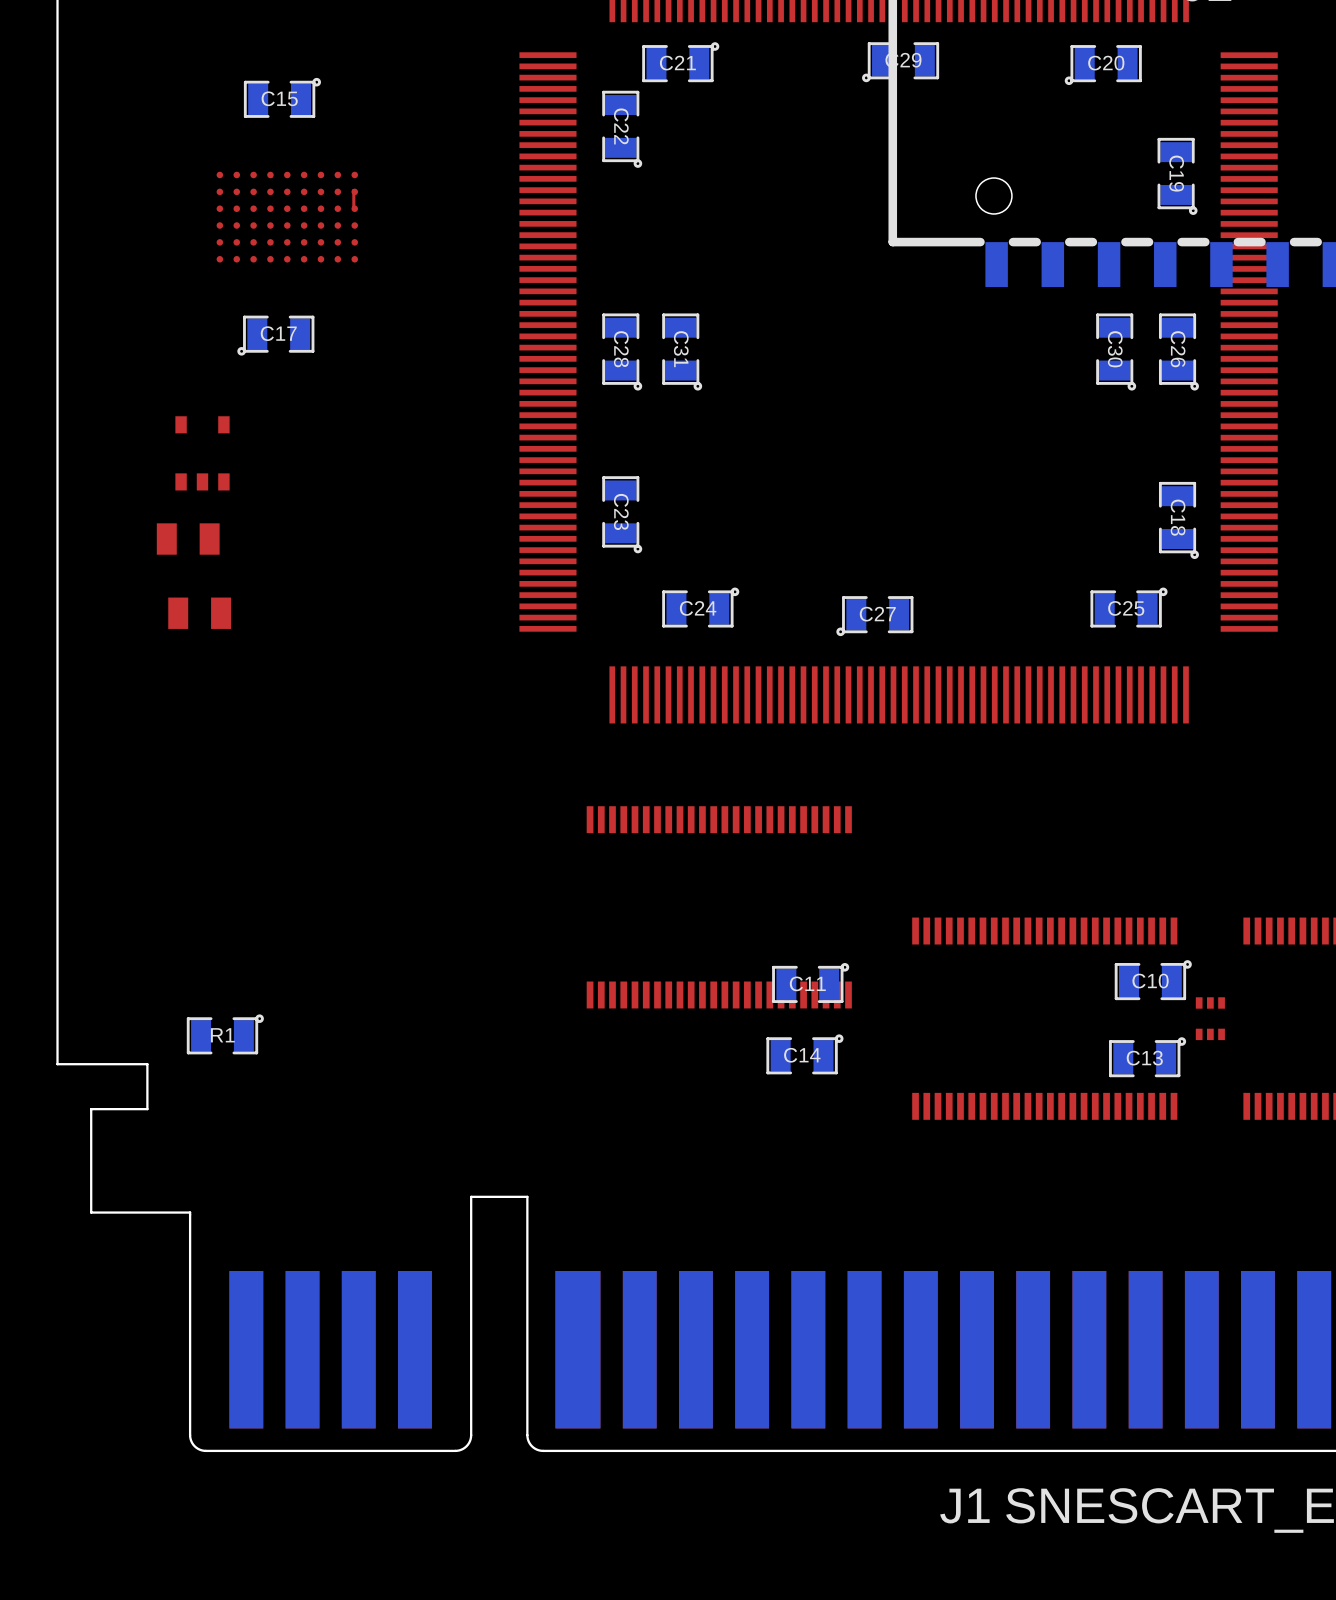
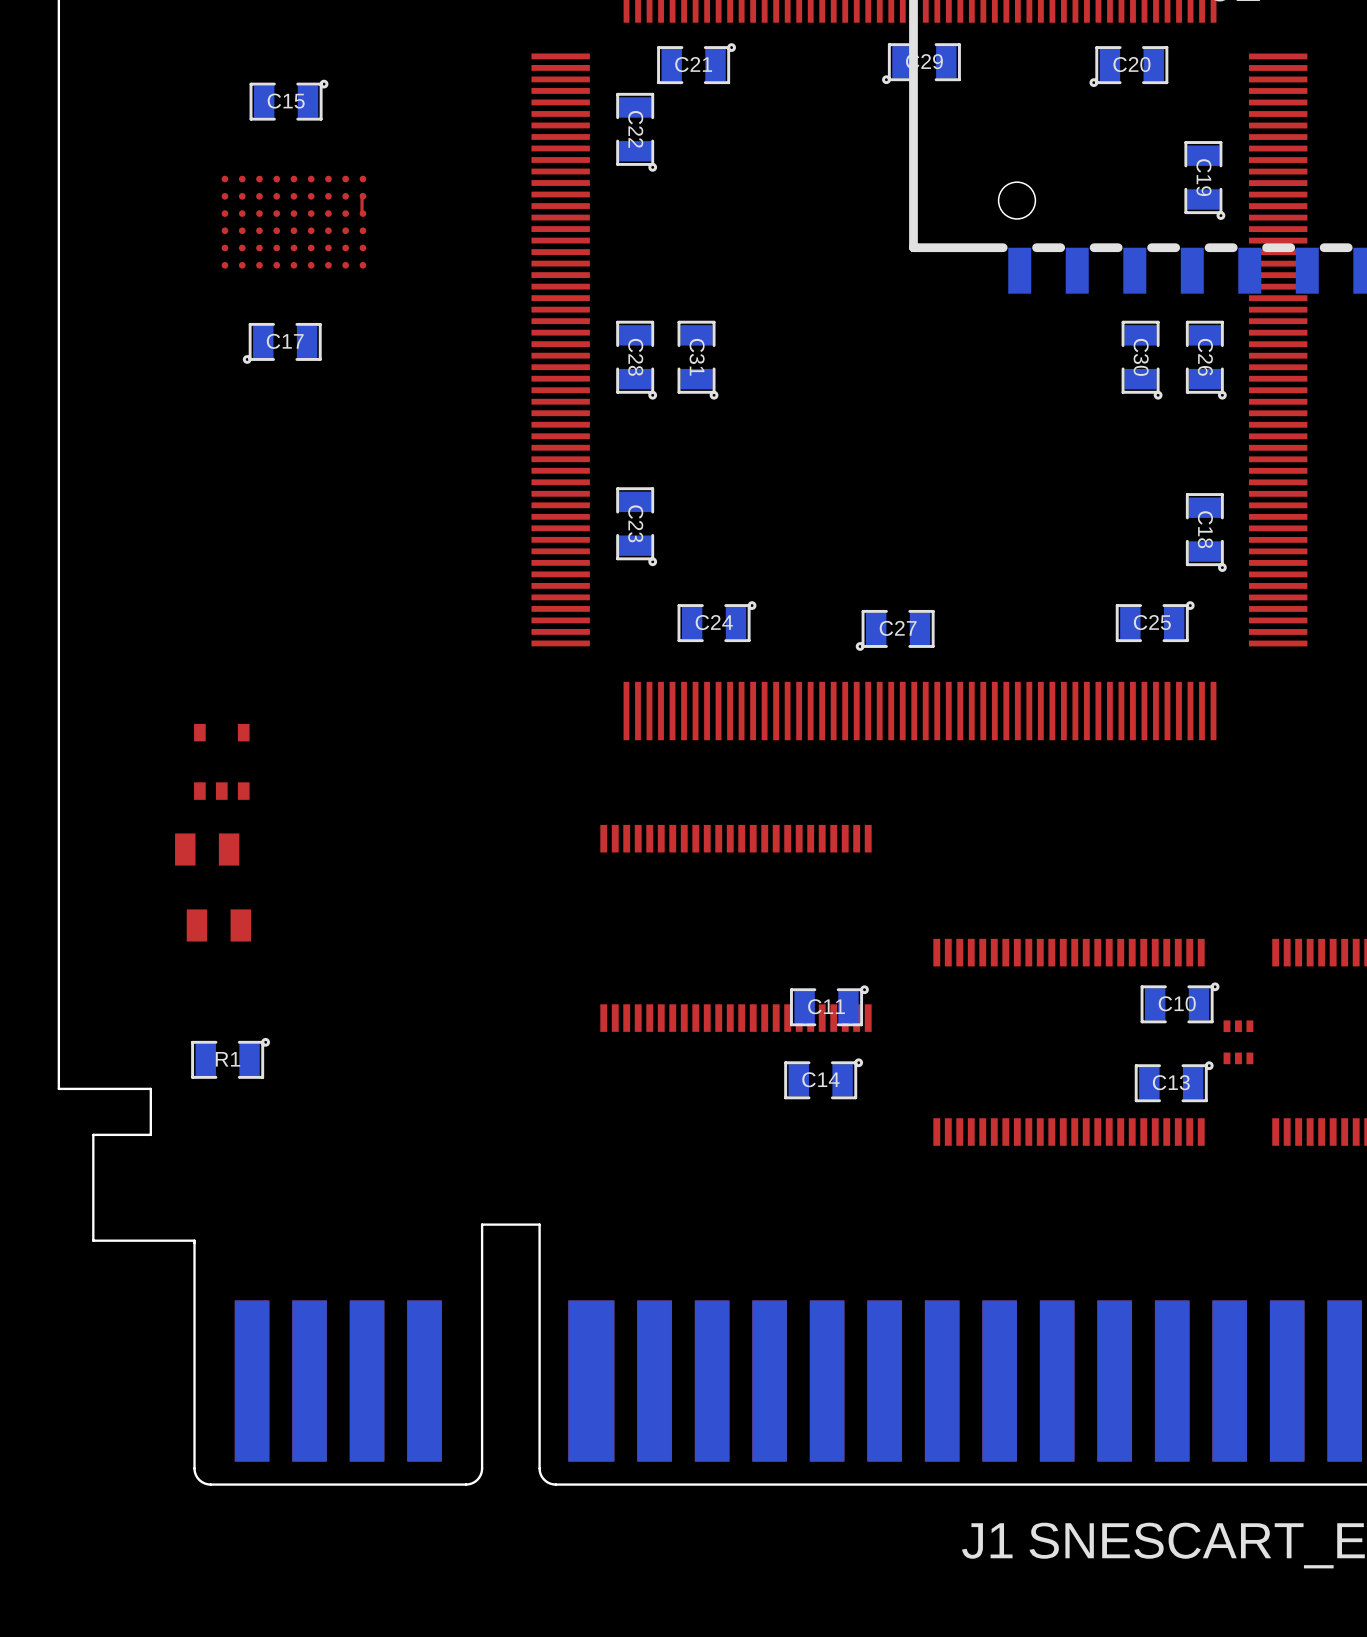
part position: (202, 453) -> (221, 761)
part: (188, 539) -> none
part: (199, 613) -> none
part: none -> (207, 849)
part: none -> (218, 925)

